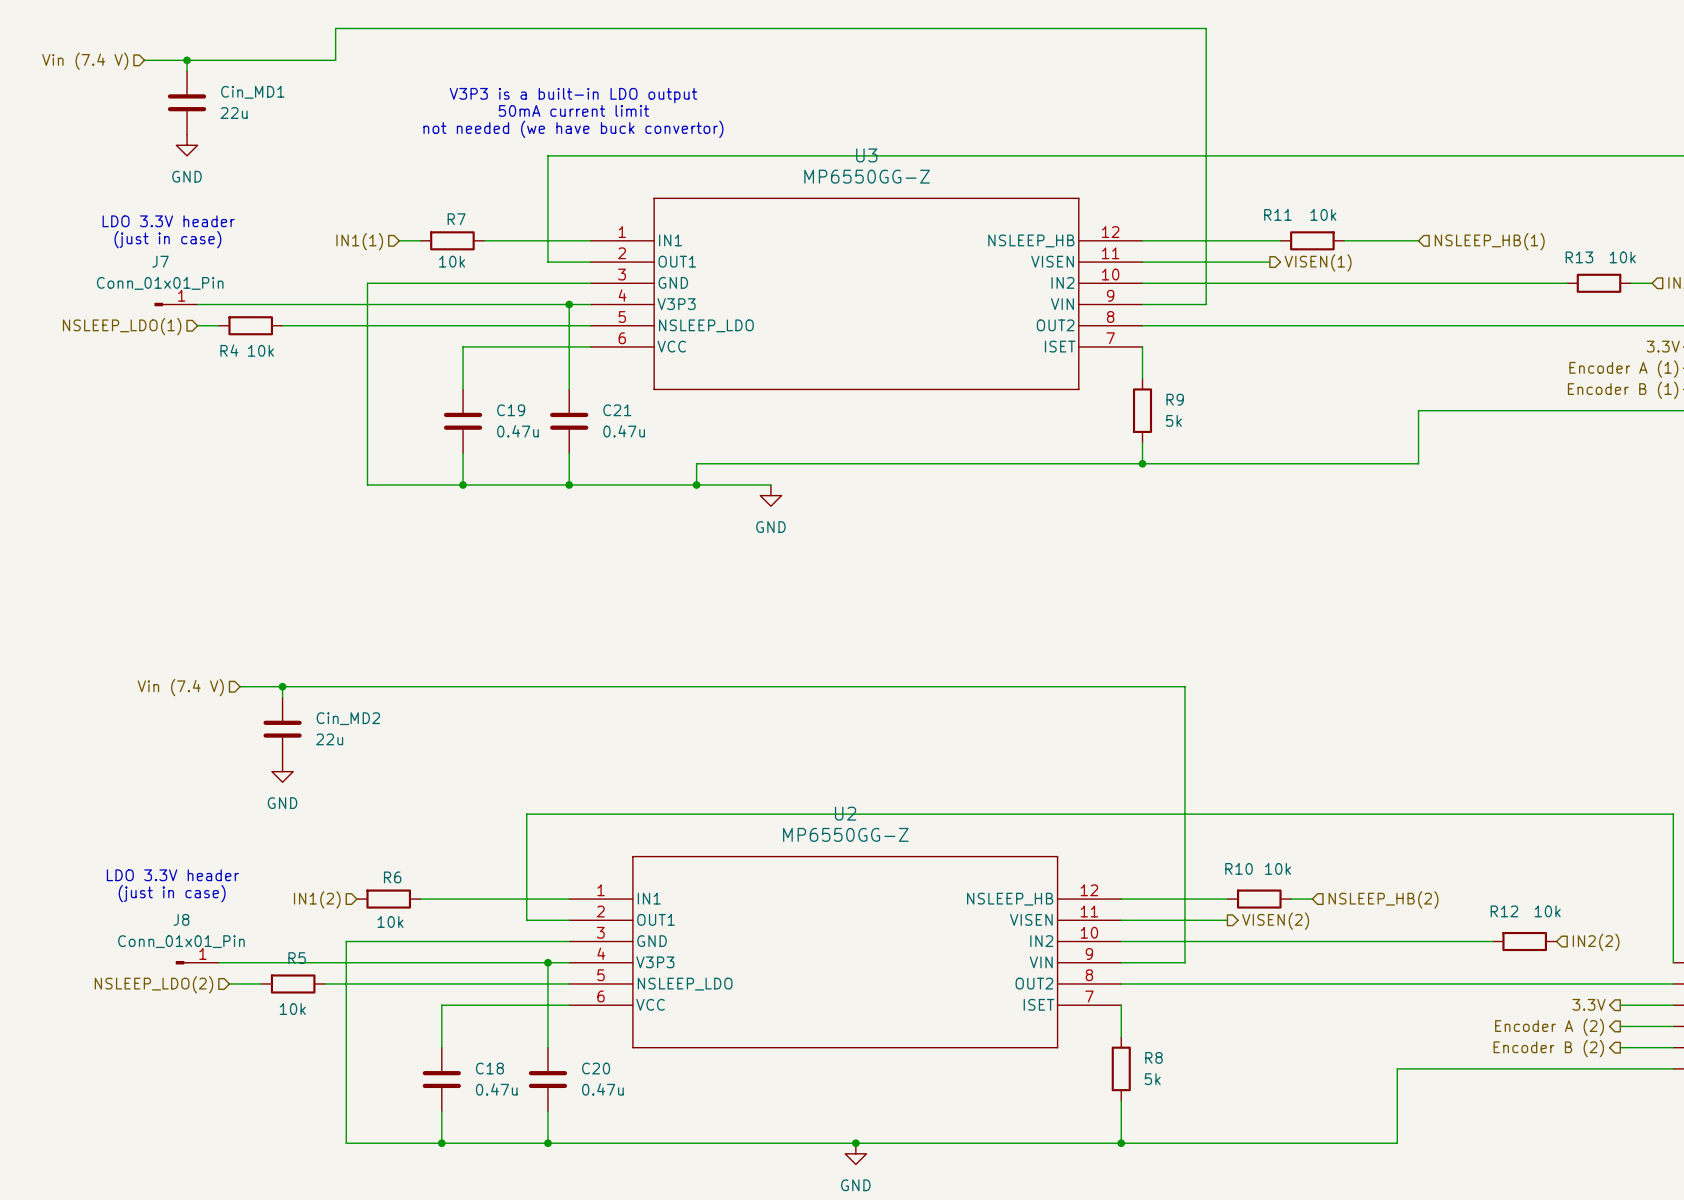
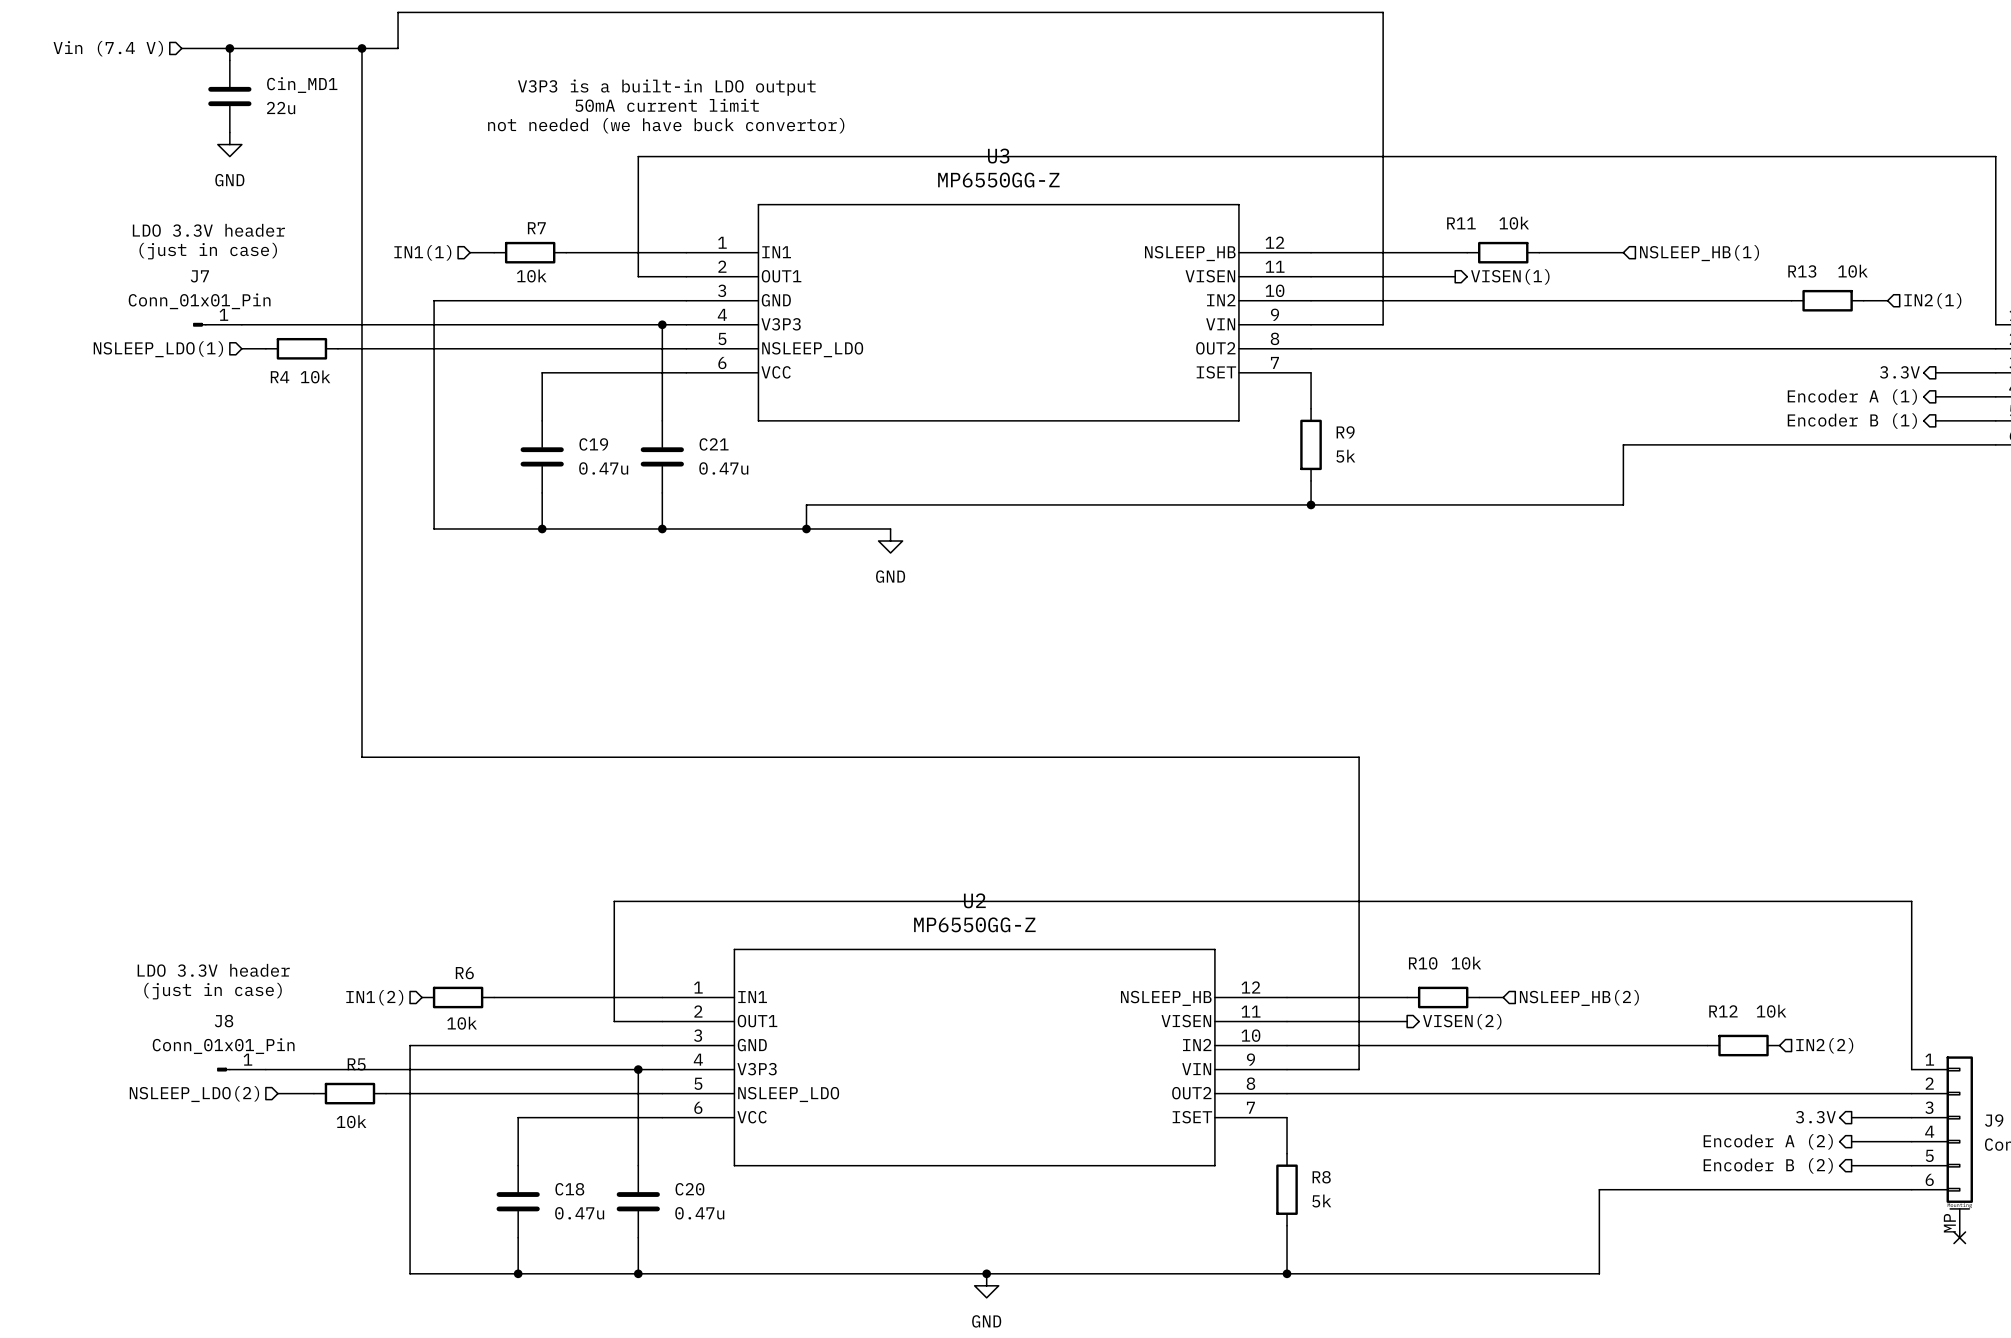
junction: none -> (361, 48)
wire: (240, 686) (303, 686) -> (361, 48) (361, 757)
wire: (282, 686) (282, 697) -> none
junction: (282, 686) -> none
hierarchical label: Vin (7.4 V) (180, 687) -> none
Cin_MD2: 22u (282, 729) -> none
power symbol: GND (282, 771) -> none

